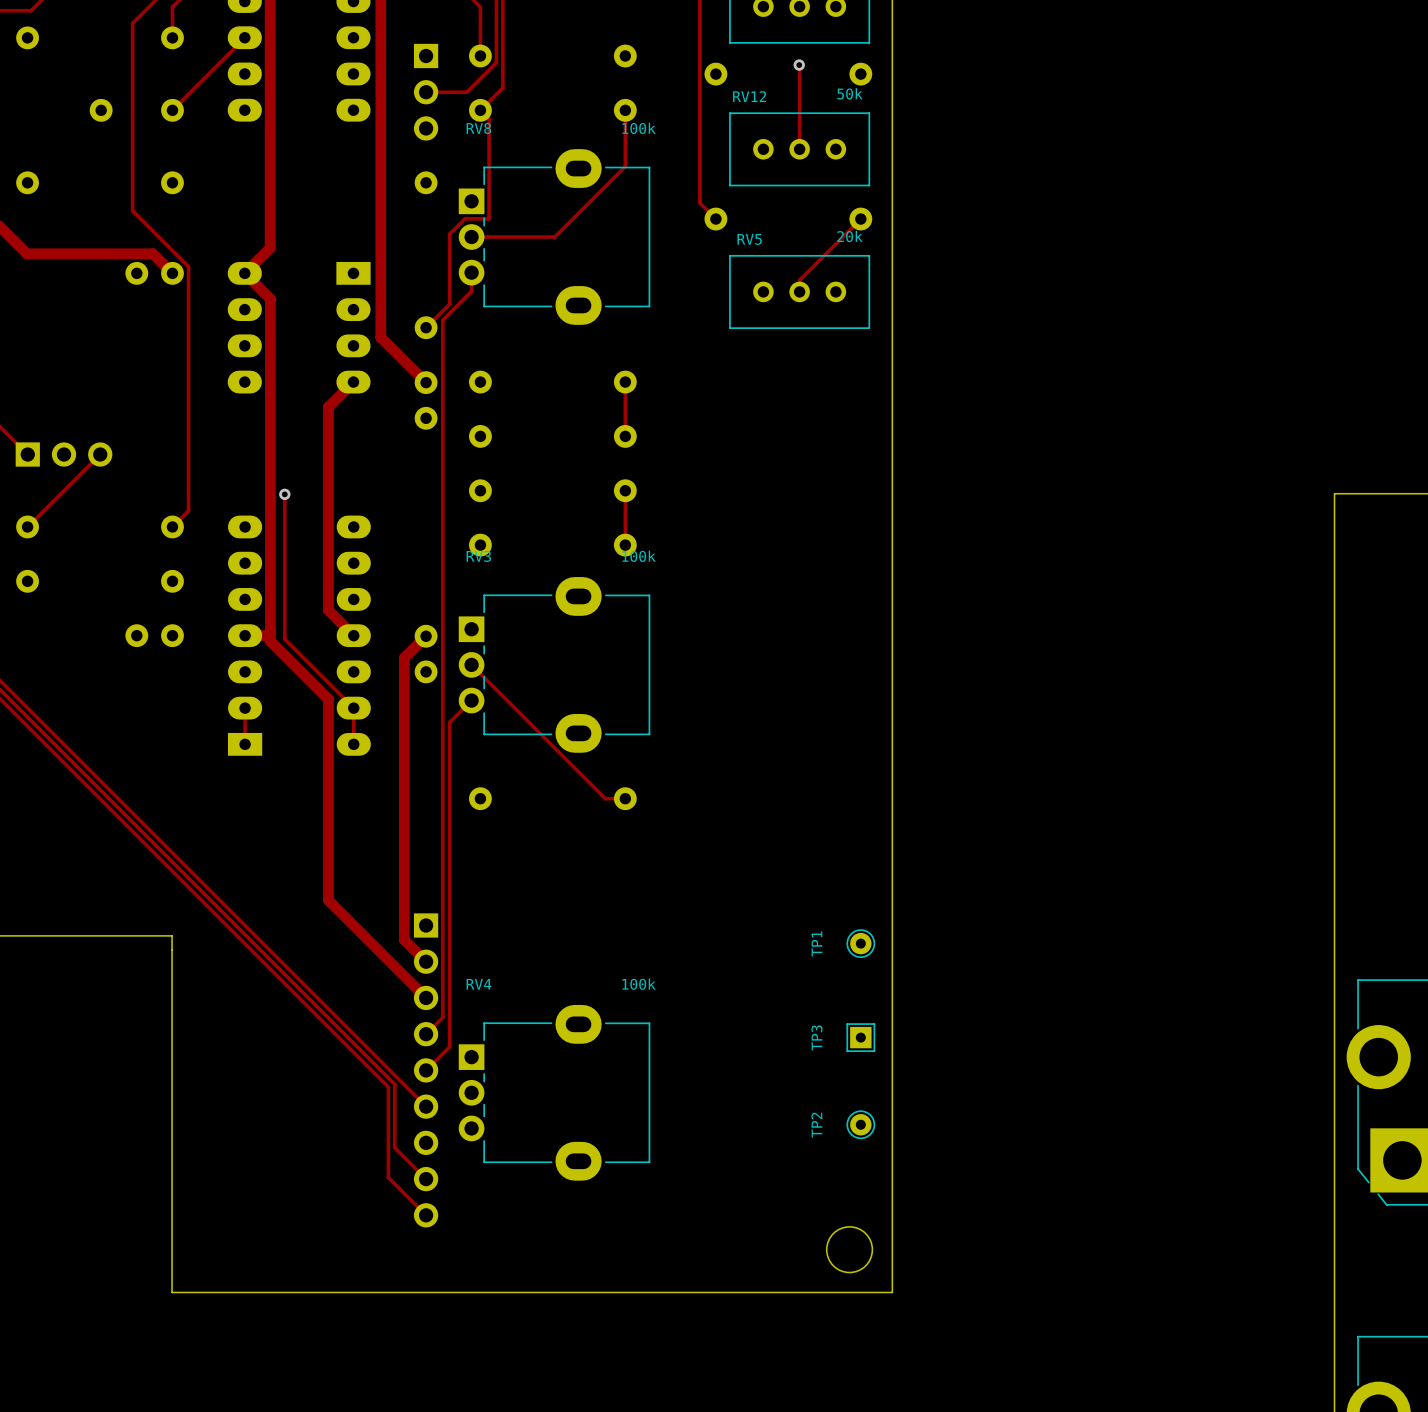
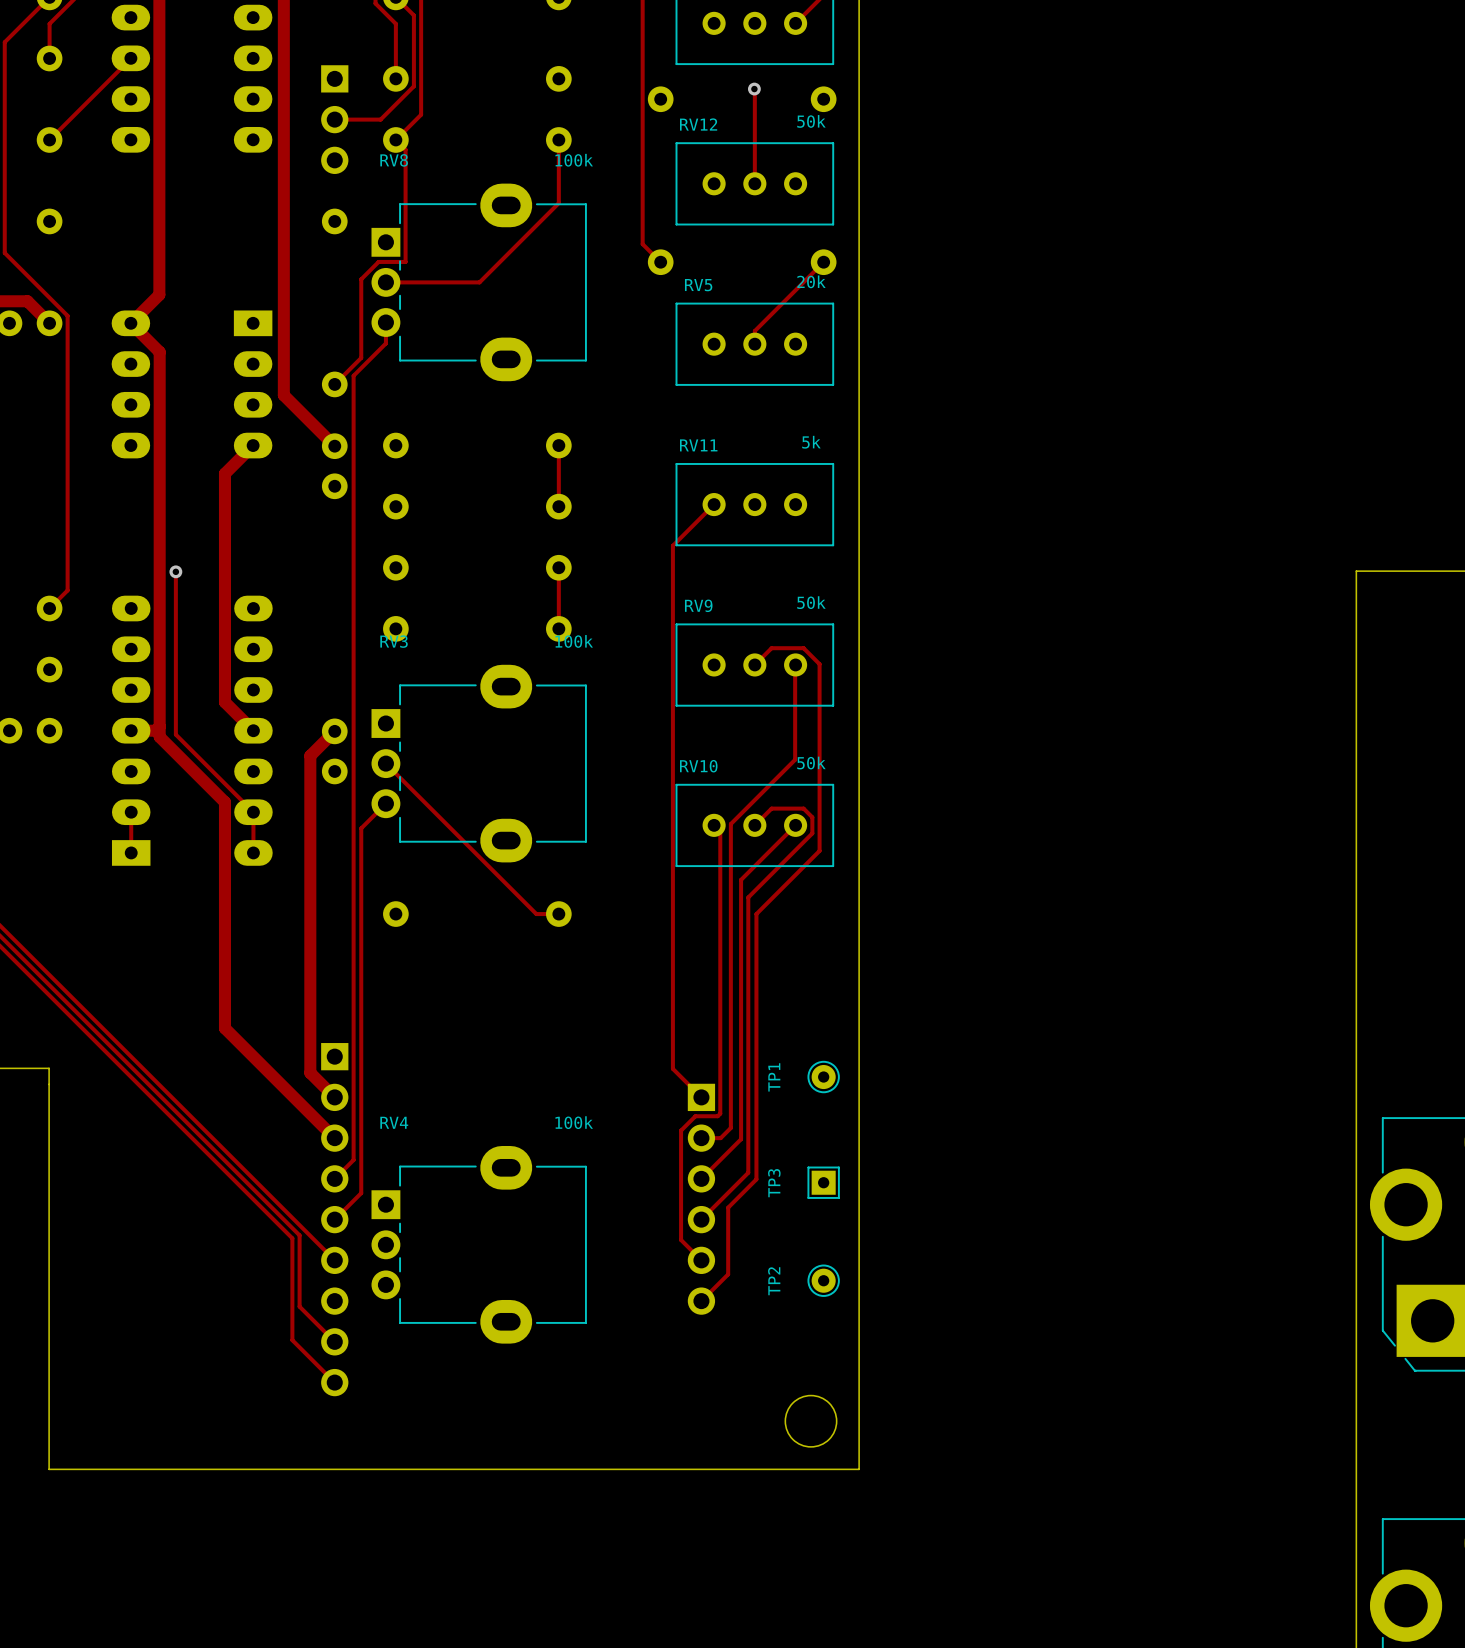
track: none -> (714, 504) (672, 545) (672, 1068) (701, 1097)
RV11: none -> 5k (754, 504)
track: none -> (754, 664) (771, 648) (803, 648) (819, 664) (819, 850) (756, 914) (756, 1179) (728, 1207) (728, 1274) (701, 1301)
RV9: none -> 50k (754, 665)
track: none -> (795, 665) (795, 759) (730, 824) (730, 1127) (720, 1138) (701, 1138)
track: none -> (754, 825) (771, 808) (803, 808) (812, 817) (812, 833) (748, 897) (748, 1172) (701, 1219)
RV10: none -> 50k (754, 825)
track: none -> (795, 825) (741, 879) (741, 1139) (701, 1178)
track: none -> (720, 831) (720, 1113) (717, 1116) (695, 1116) (681, 1130) (681, 1239) (701, 1260)
part: none -> (701, 1199)

